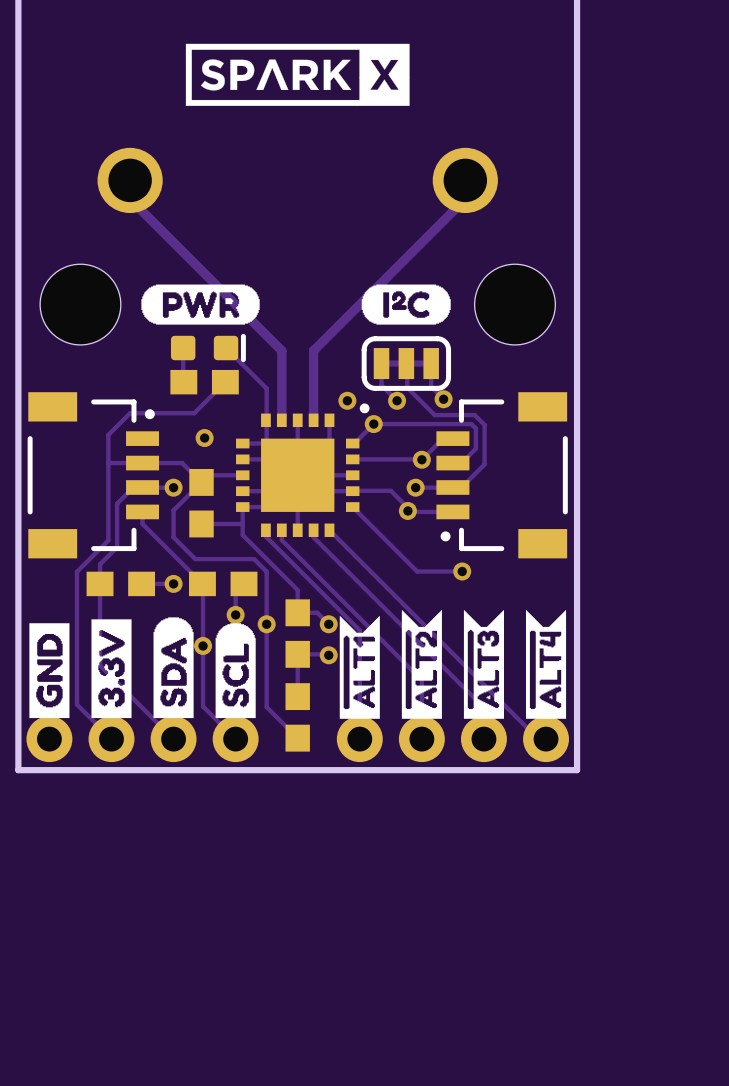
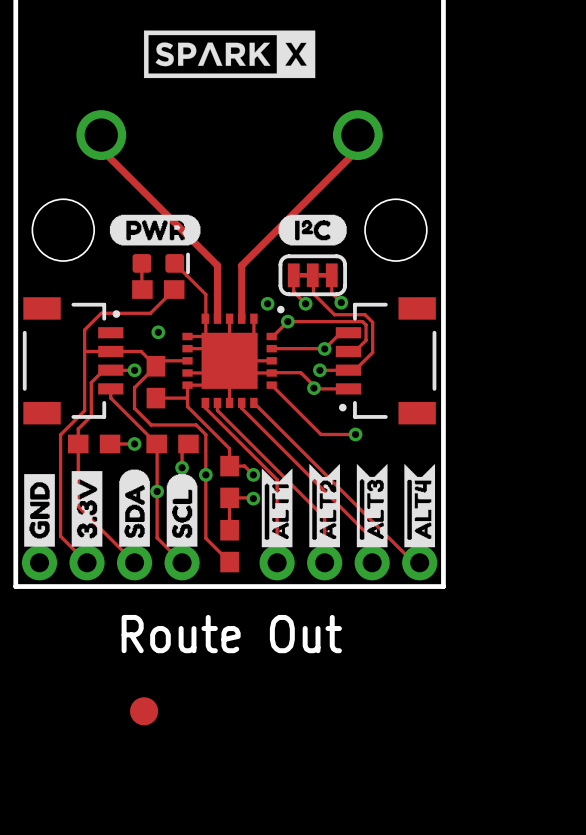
text: none -> Route Out (231, 634)
part: none -> (144, 711)

